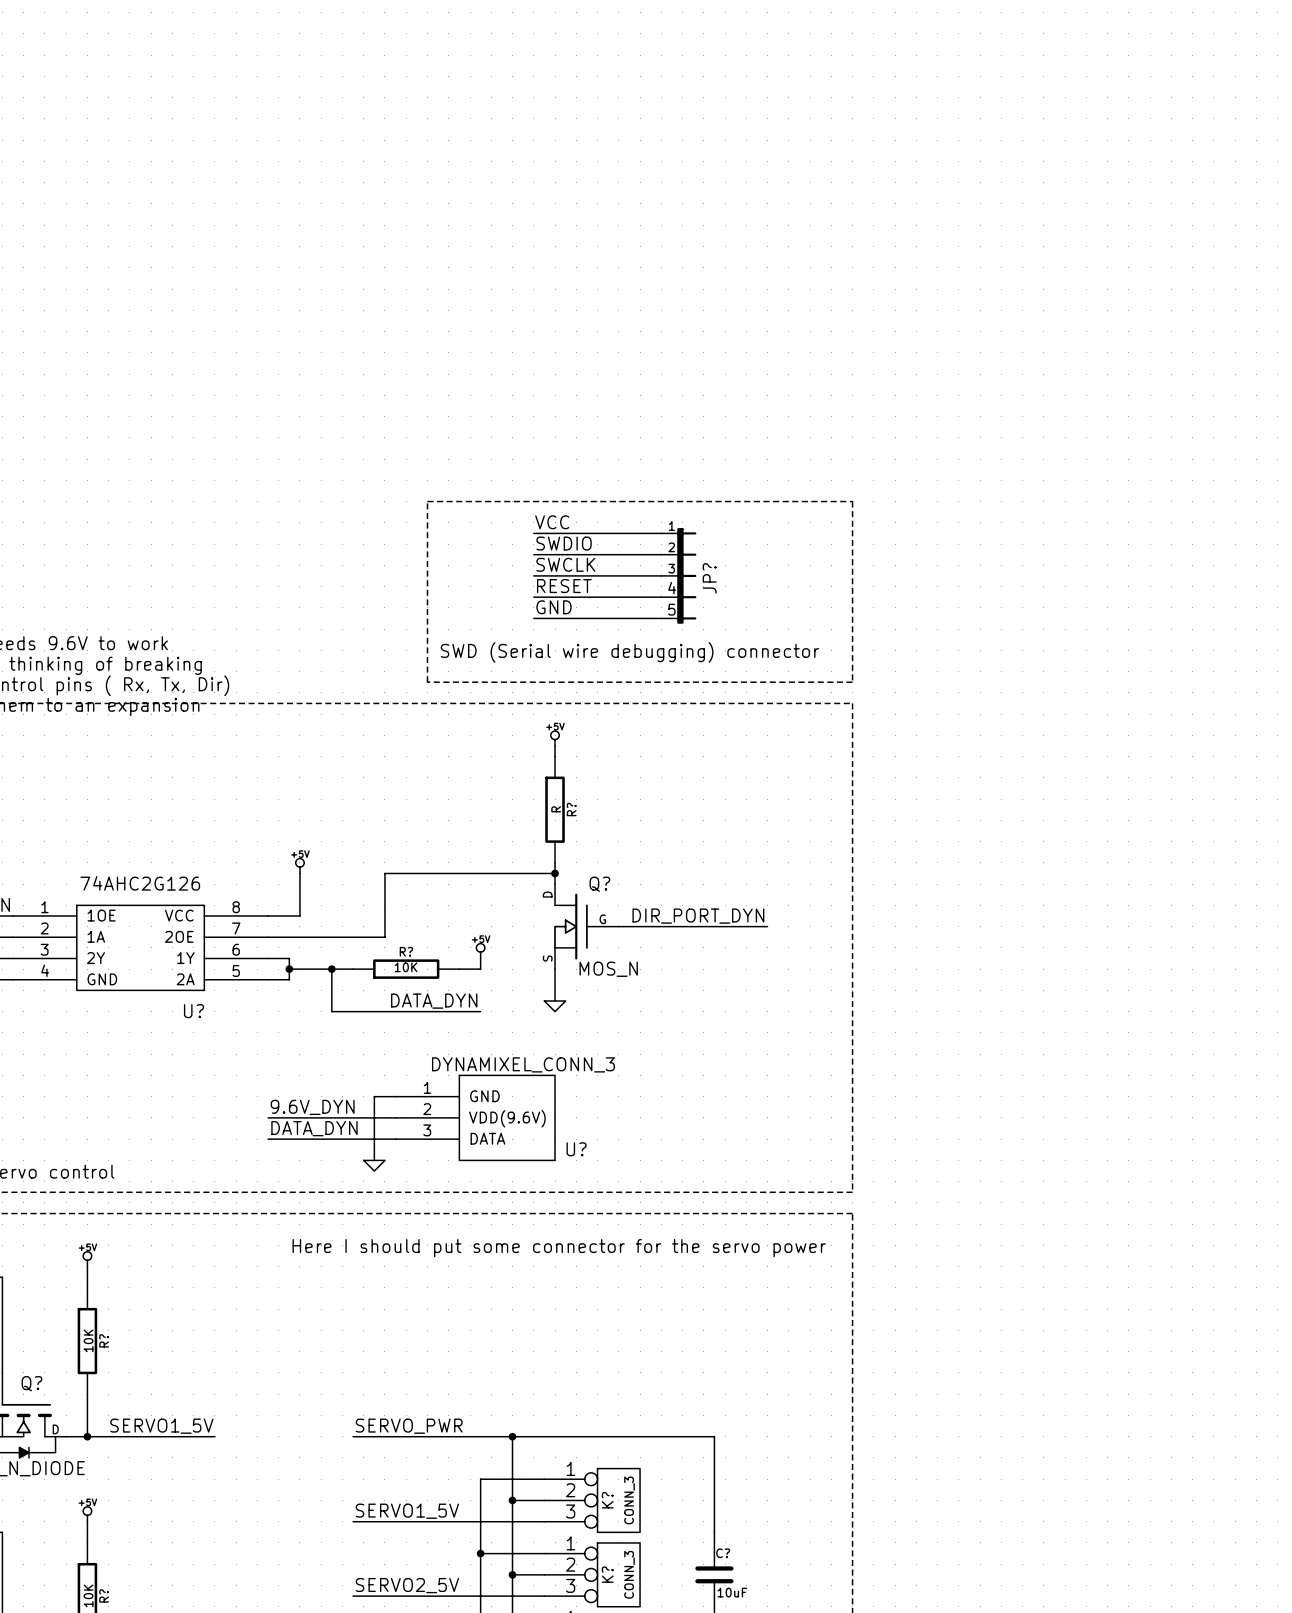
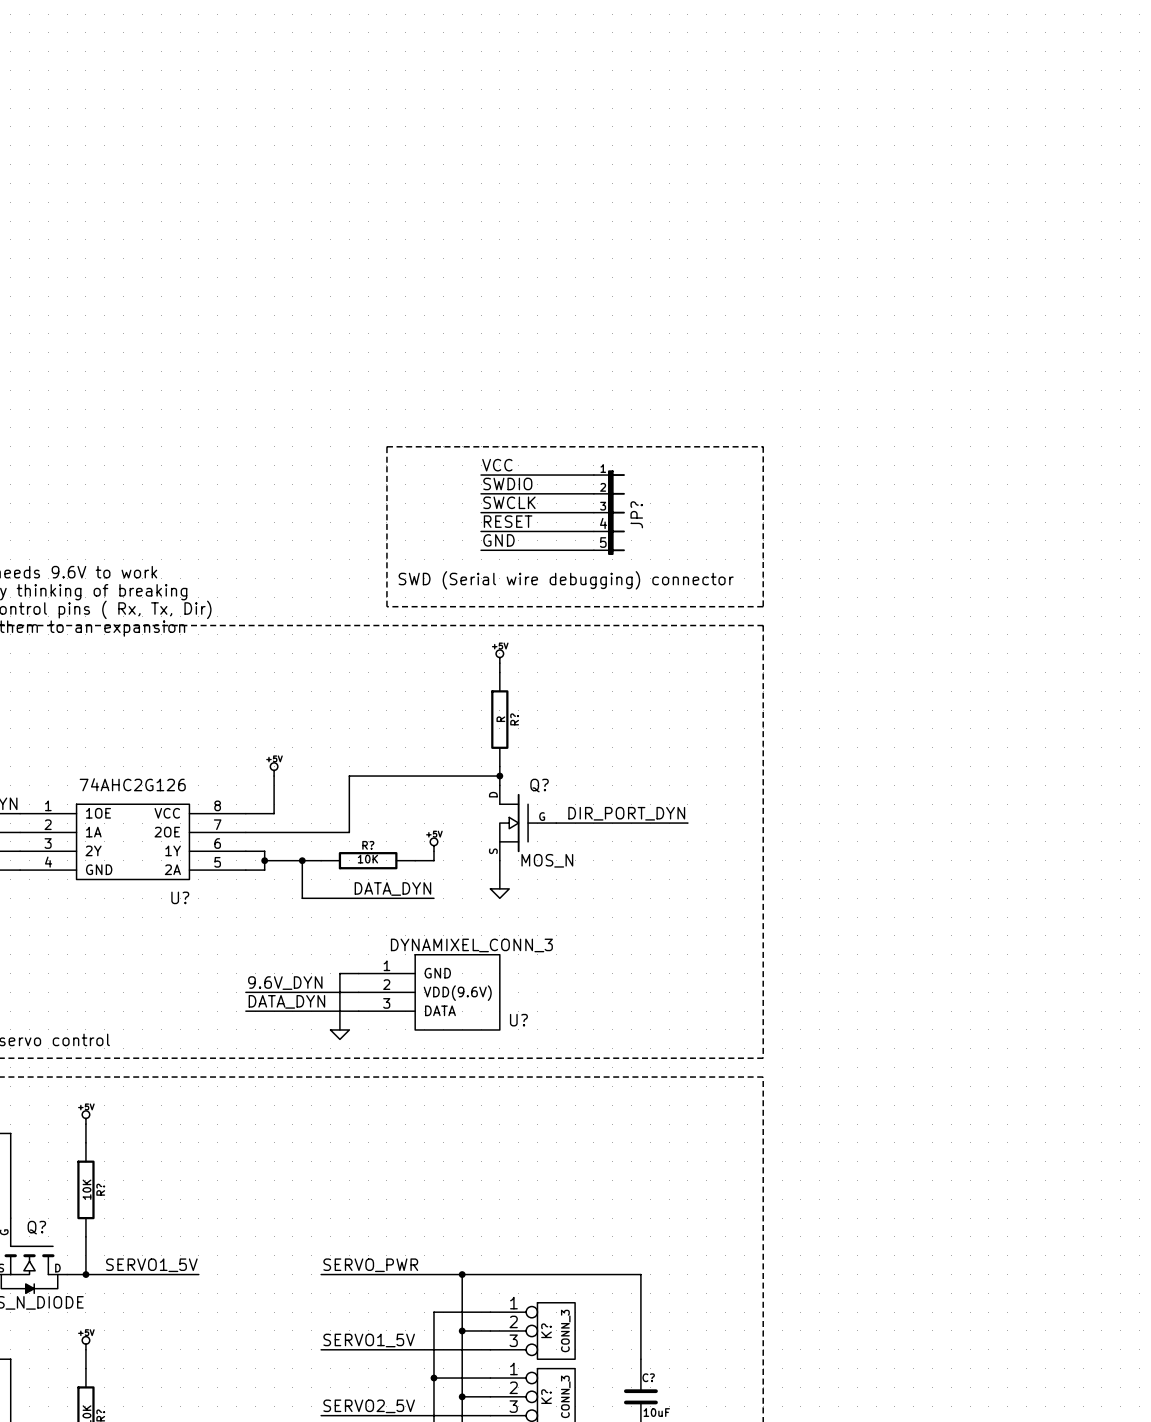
text: Here I should put some connector for the servo power (559, 1248) -> none

